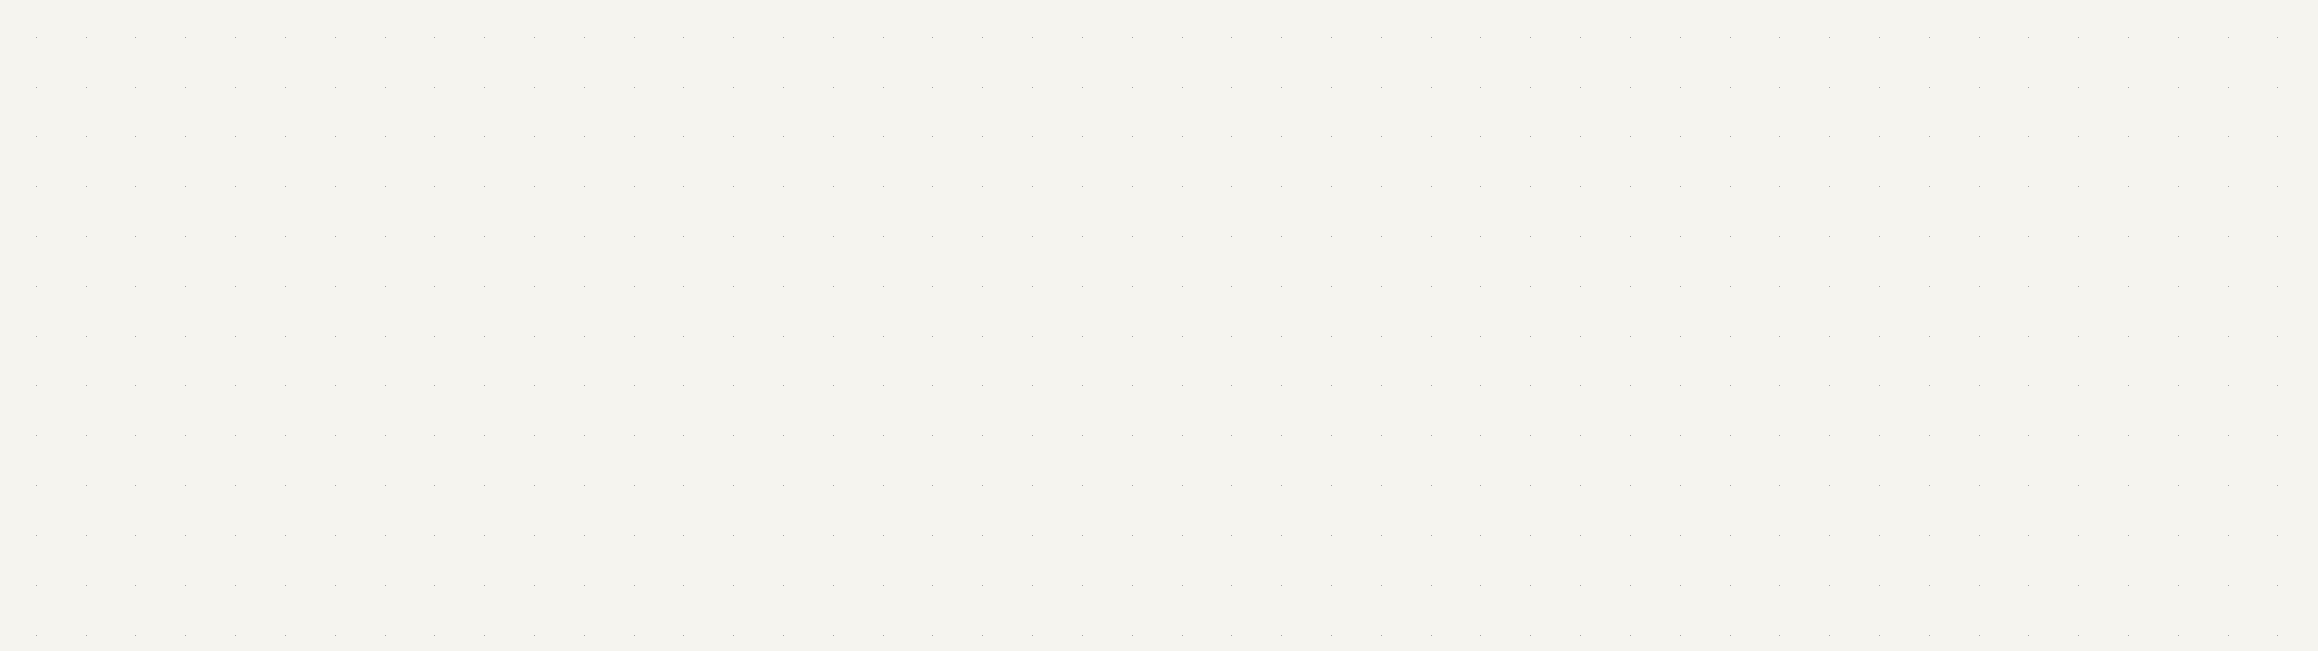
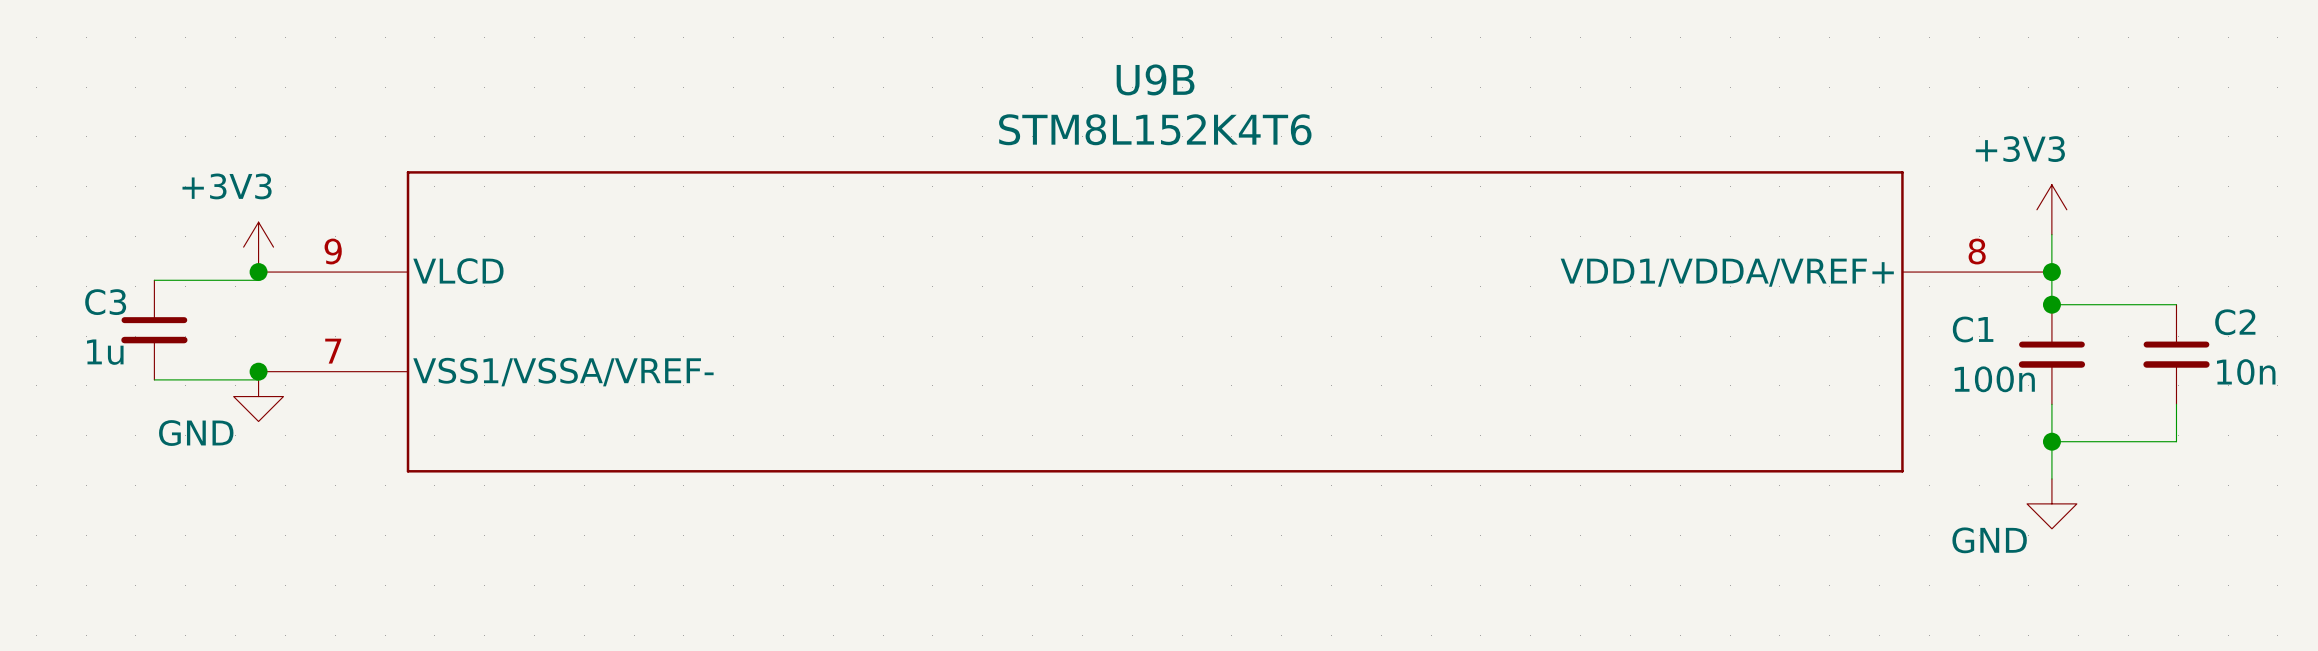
power symbol: none -> +3V3 (2051, 209)
wire: none -> (2051, 234) (2051, 304) (2176, 304)
power symbol: none -> +3V3 (258, 247)
wire: none -> (258, 272) (258, 280) (154, 280)
junction: none -> (258, 272)
junction: none -> (2051, 272)
junction: none -> (2051, 304)
U9B: none -> STM8L152K4T6 (1155, 321)
C3: none -> 1u (154, 330)
C1: none -> 100n (2051, 354)
C2: none -> 10n (2176, 354)
wire: none -> (258, 371) (258, 379) (154, 379)
junction: none -> (258, 371)
power symbol: none -> GND (258, 396)
wire: none -> (2051, 404) (2051, 478)
wire: none -> (2176, 404) (2176, 441) (2051, 441)
junction: none -> (2051, 441)
power symbol: none -> GND (2051, 503)

